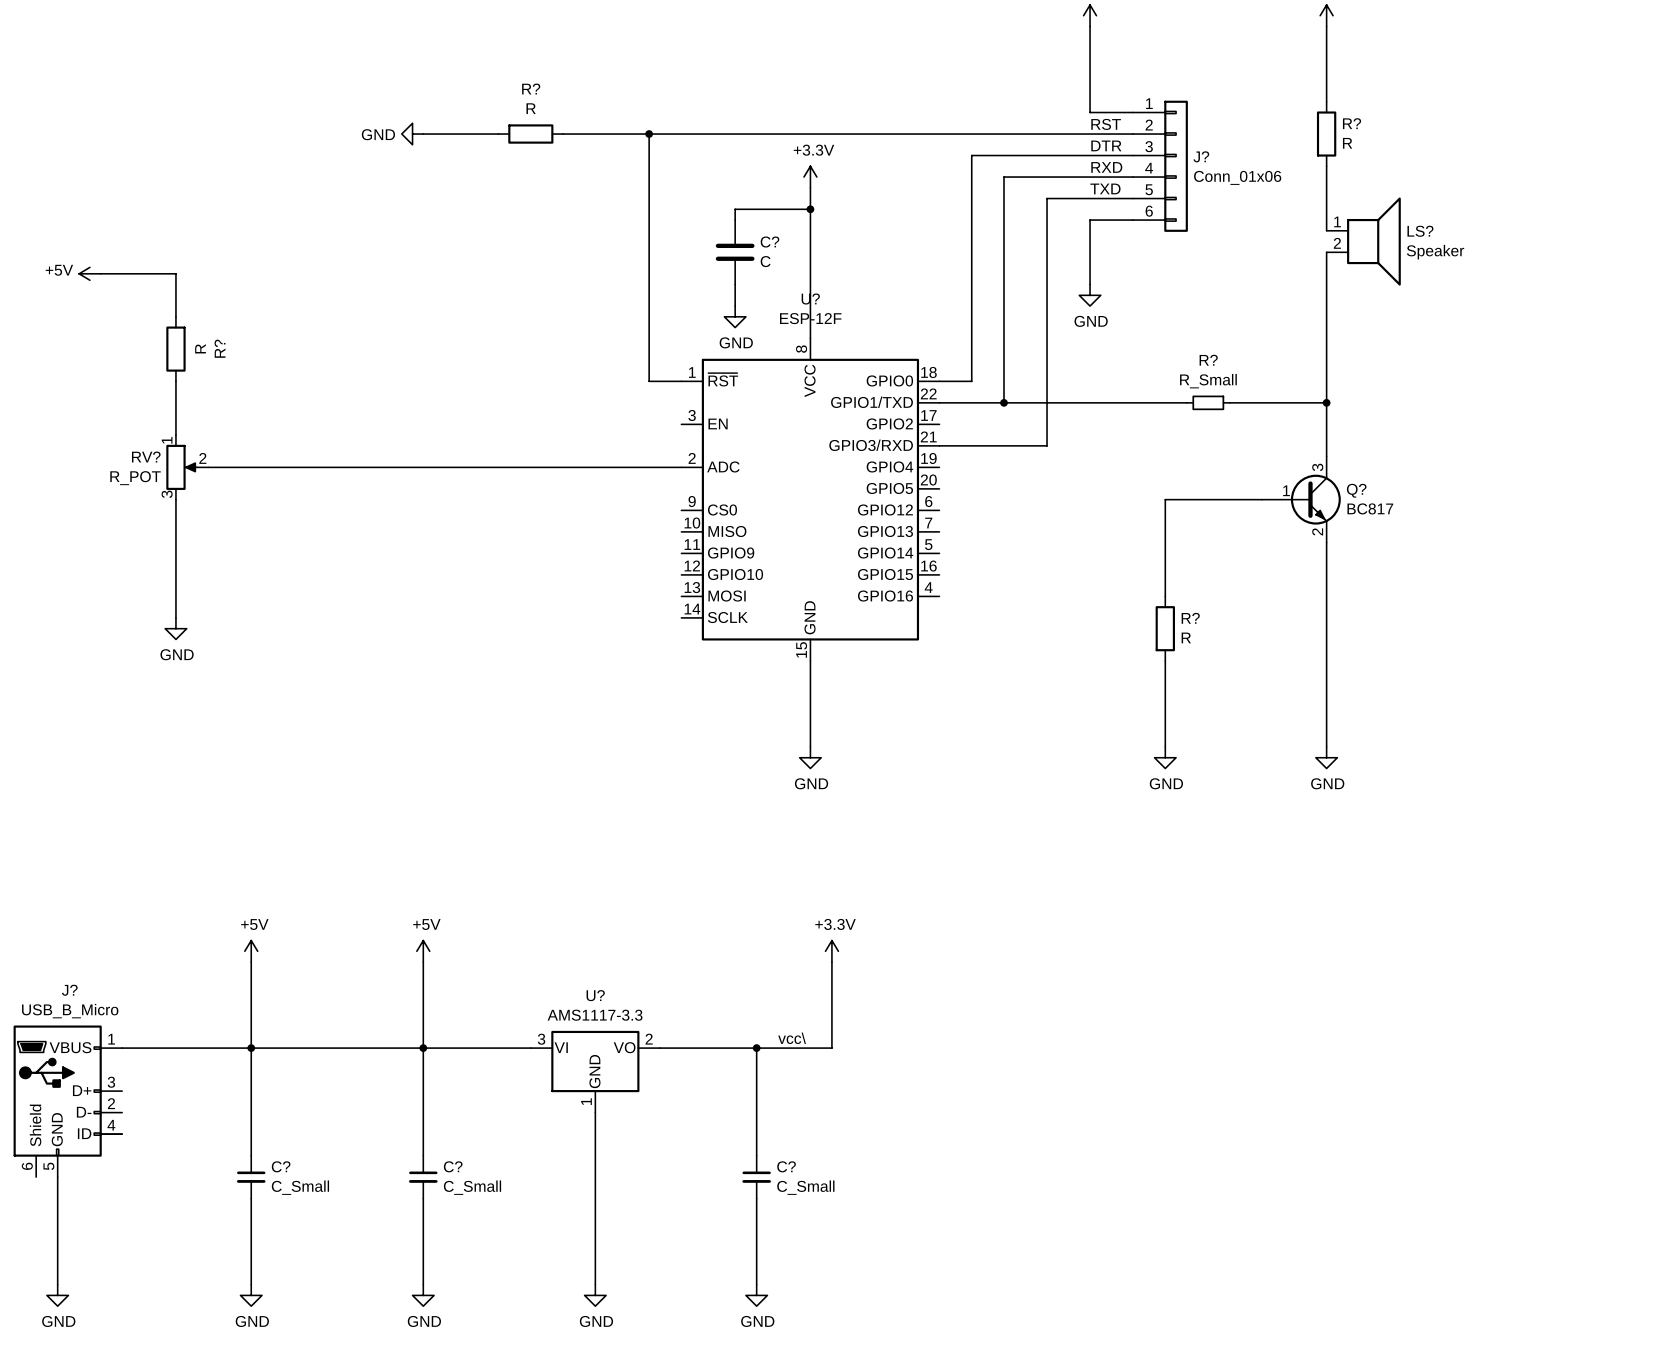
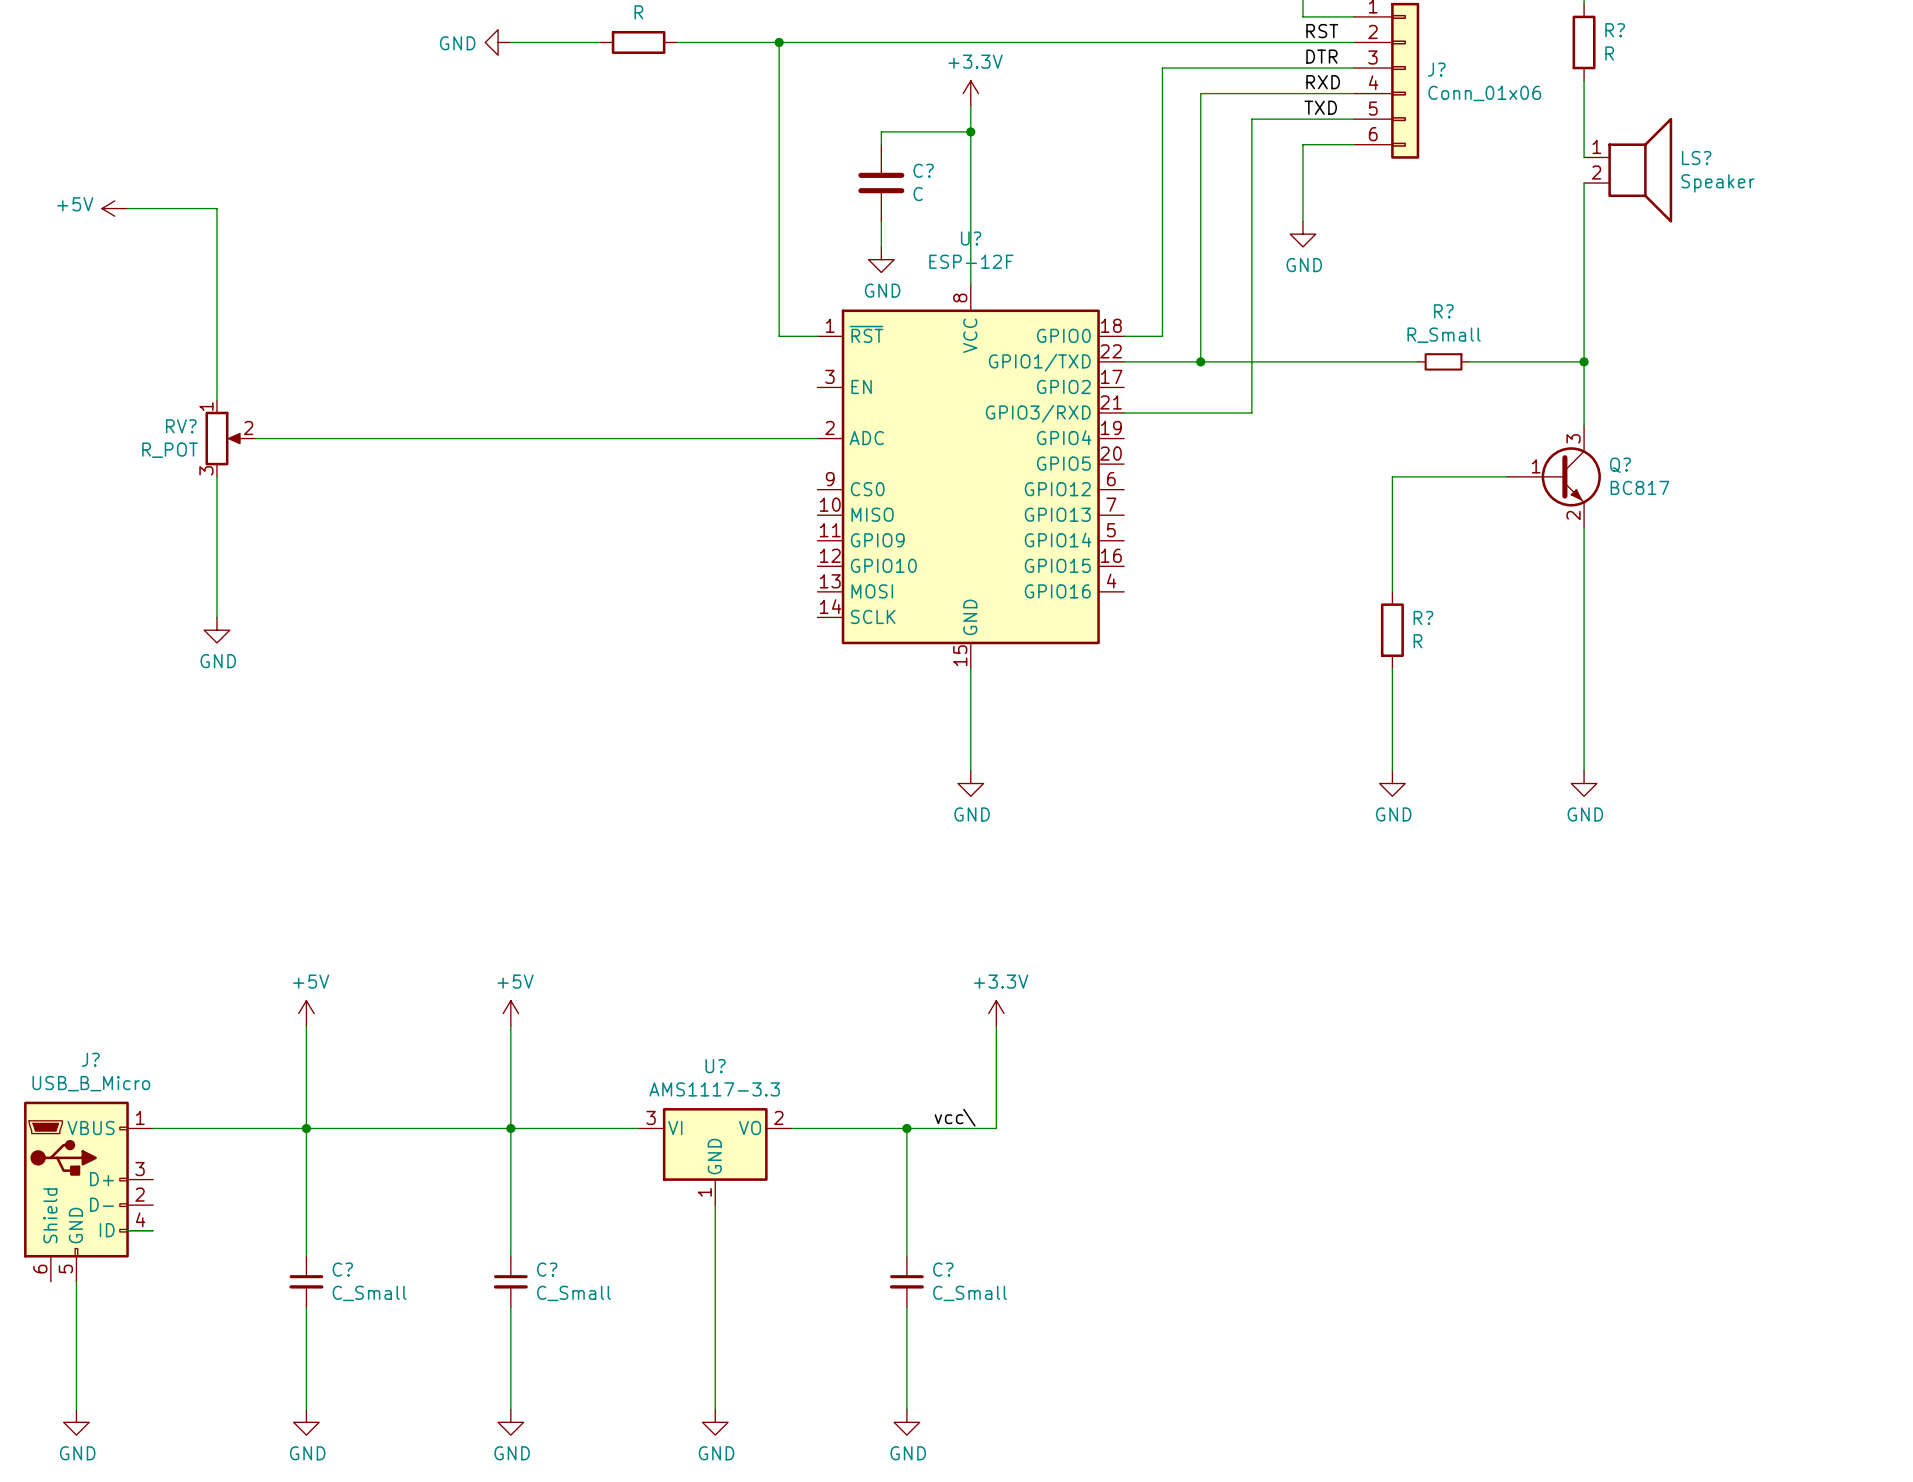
wire: none -> (216, 259) (216, 336)
R?: R (175, 349) -> none

